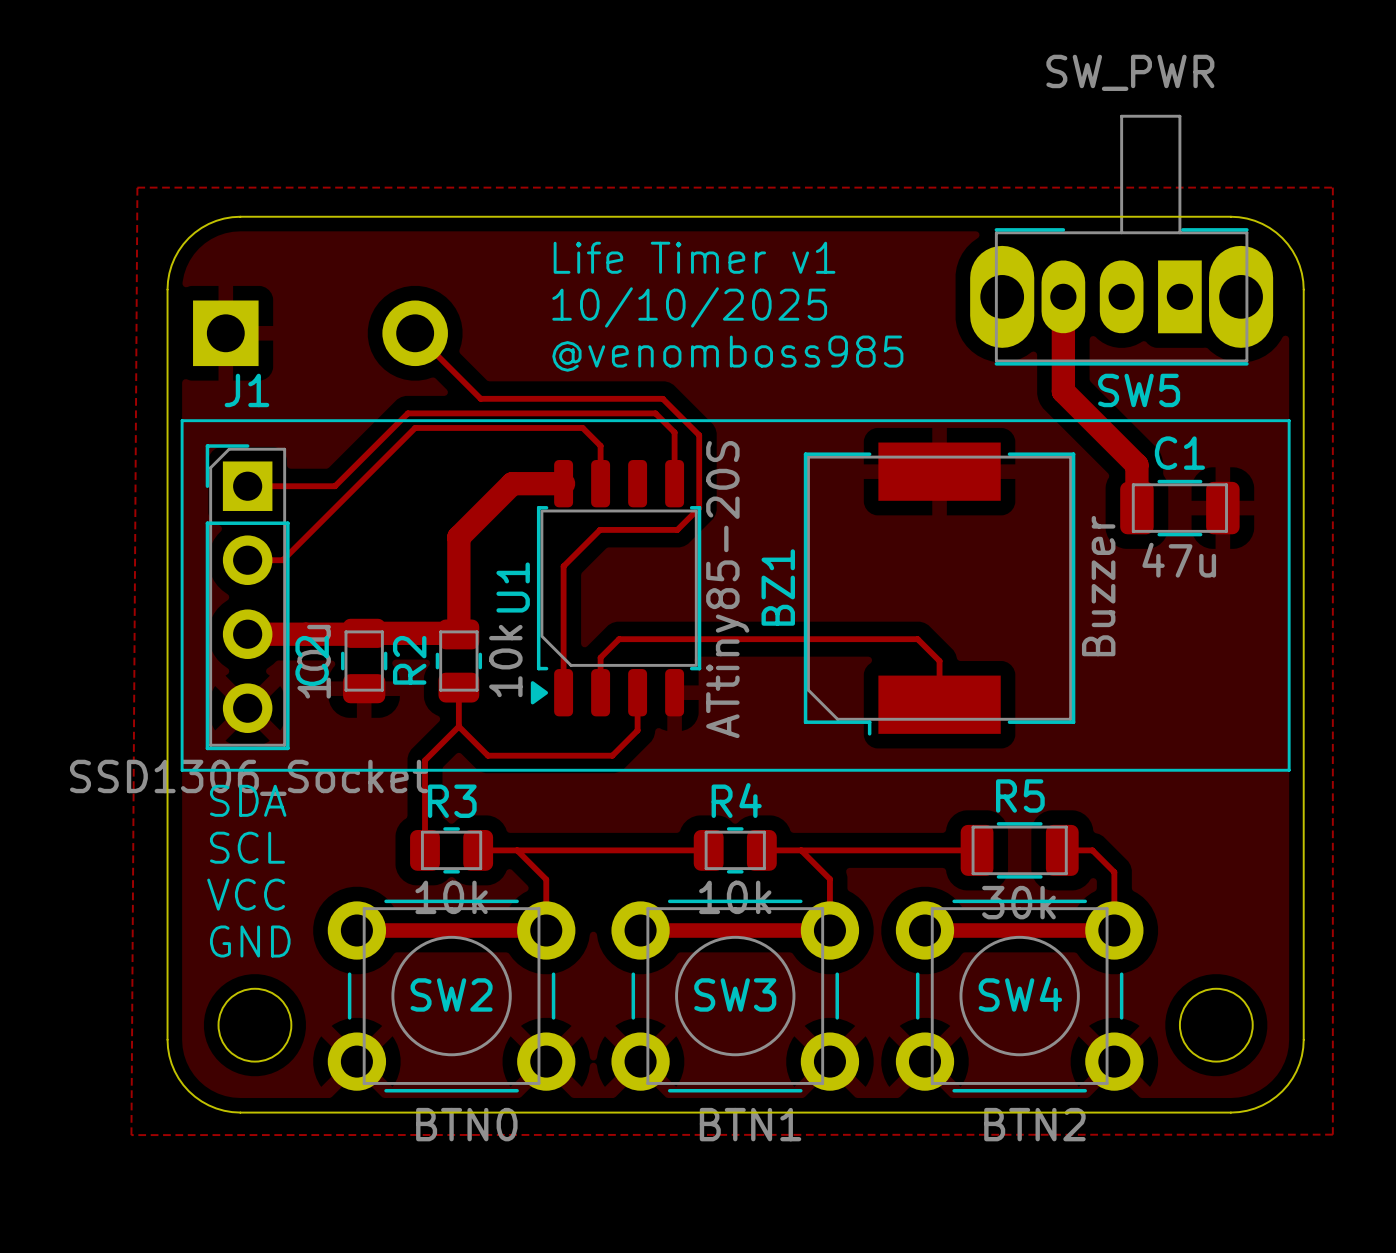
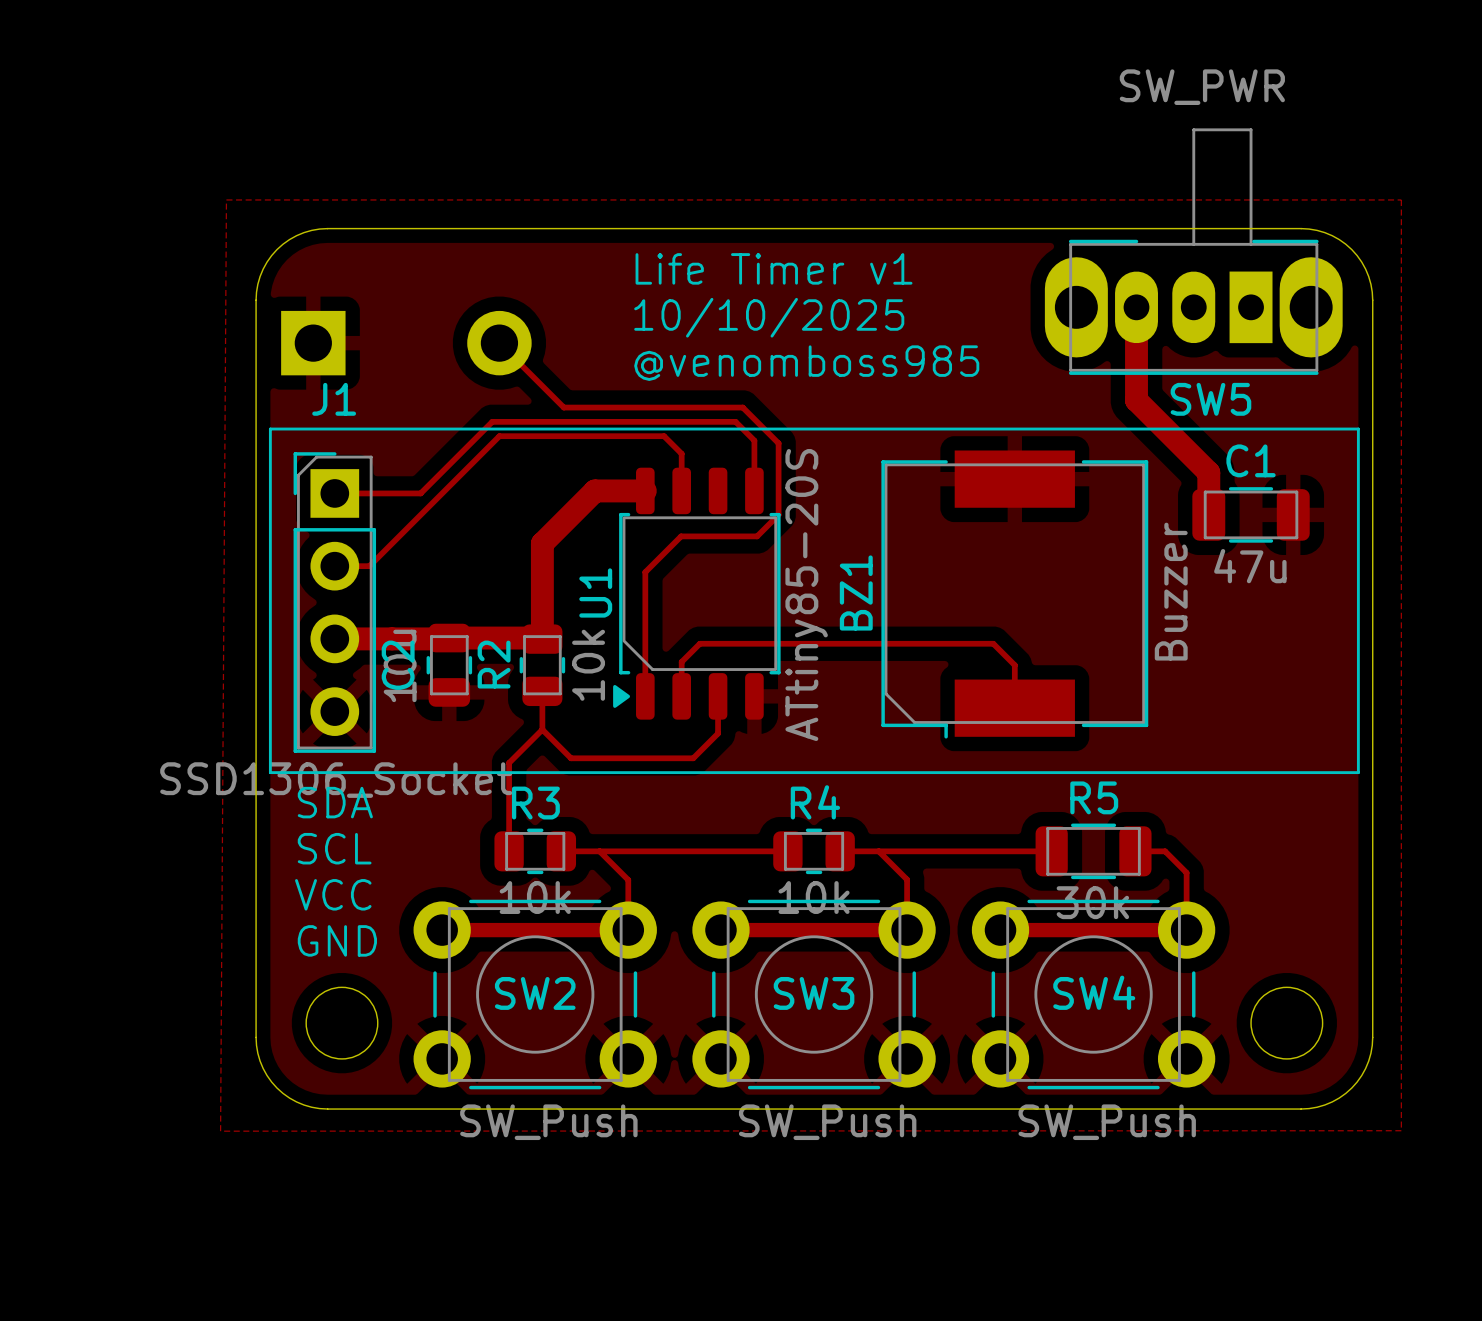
SW2 value: BTN0 (466, 1124) -> SW_Push (548, 1122)
SW3 value: BTN1 (750, 1124) -> SW_Push (827, 1122)
SW4 value: BTN2 (1034, 1124) -> SW_Push (1107, 1122)

